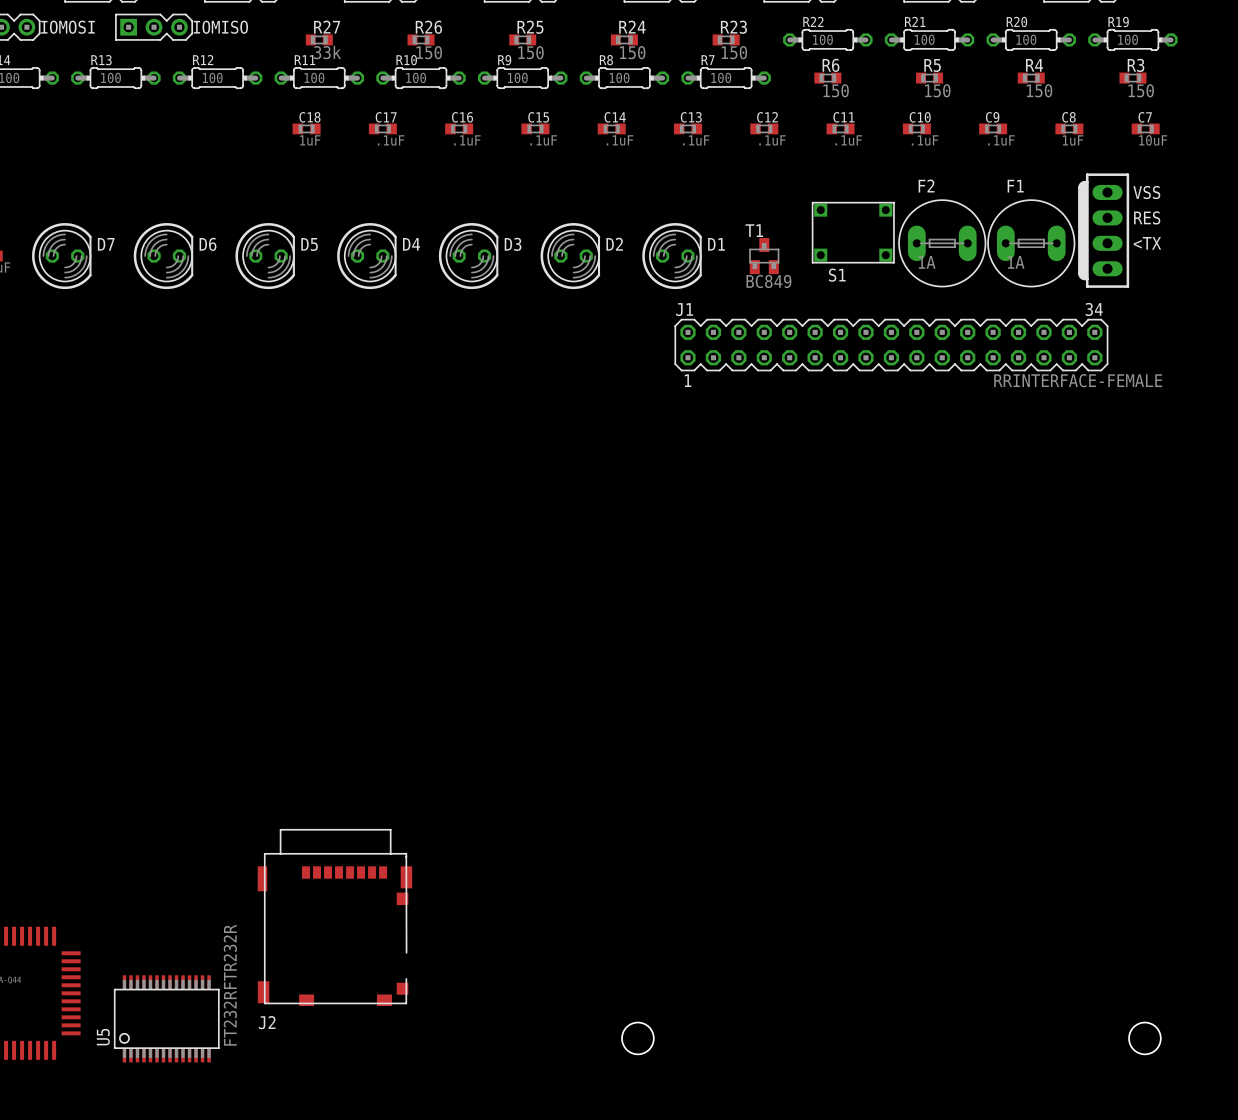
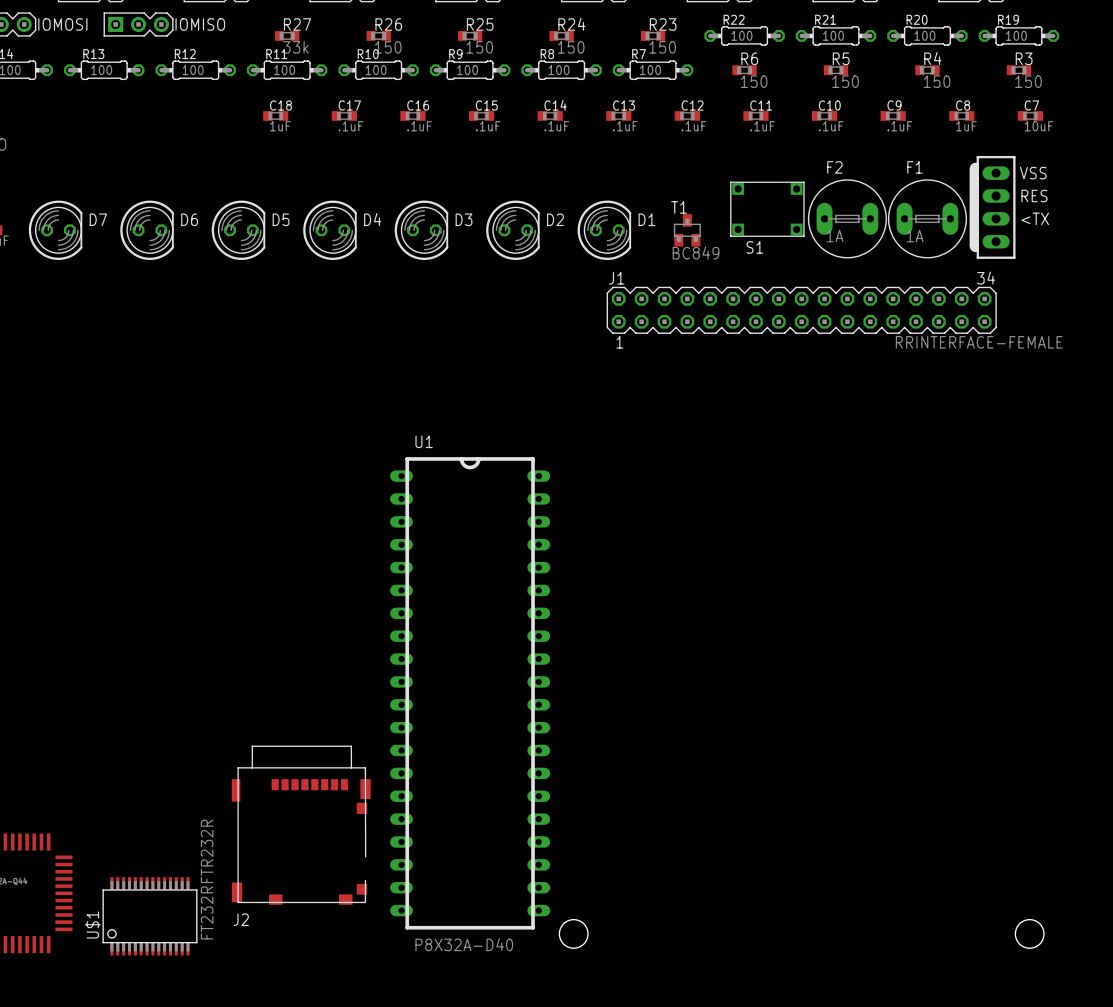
U1: none -> P8X32A-D40 (470, 693)
U5 name: U5 (103, 1037) -> U$1 (92, 924)

